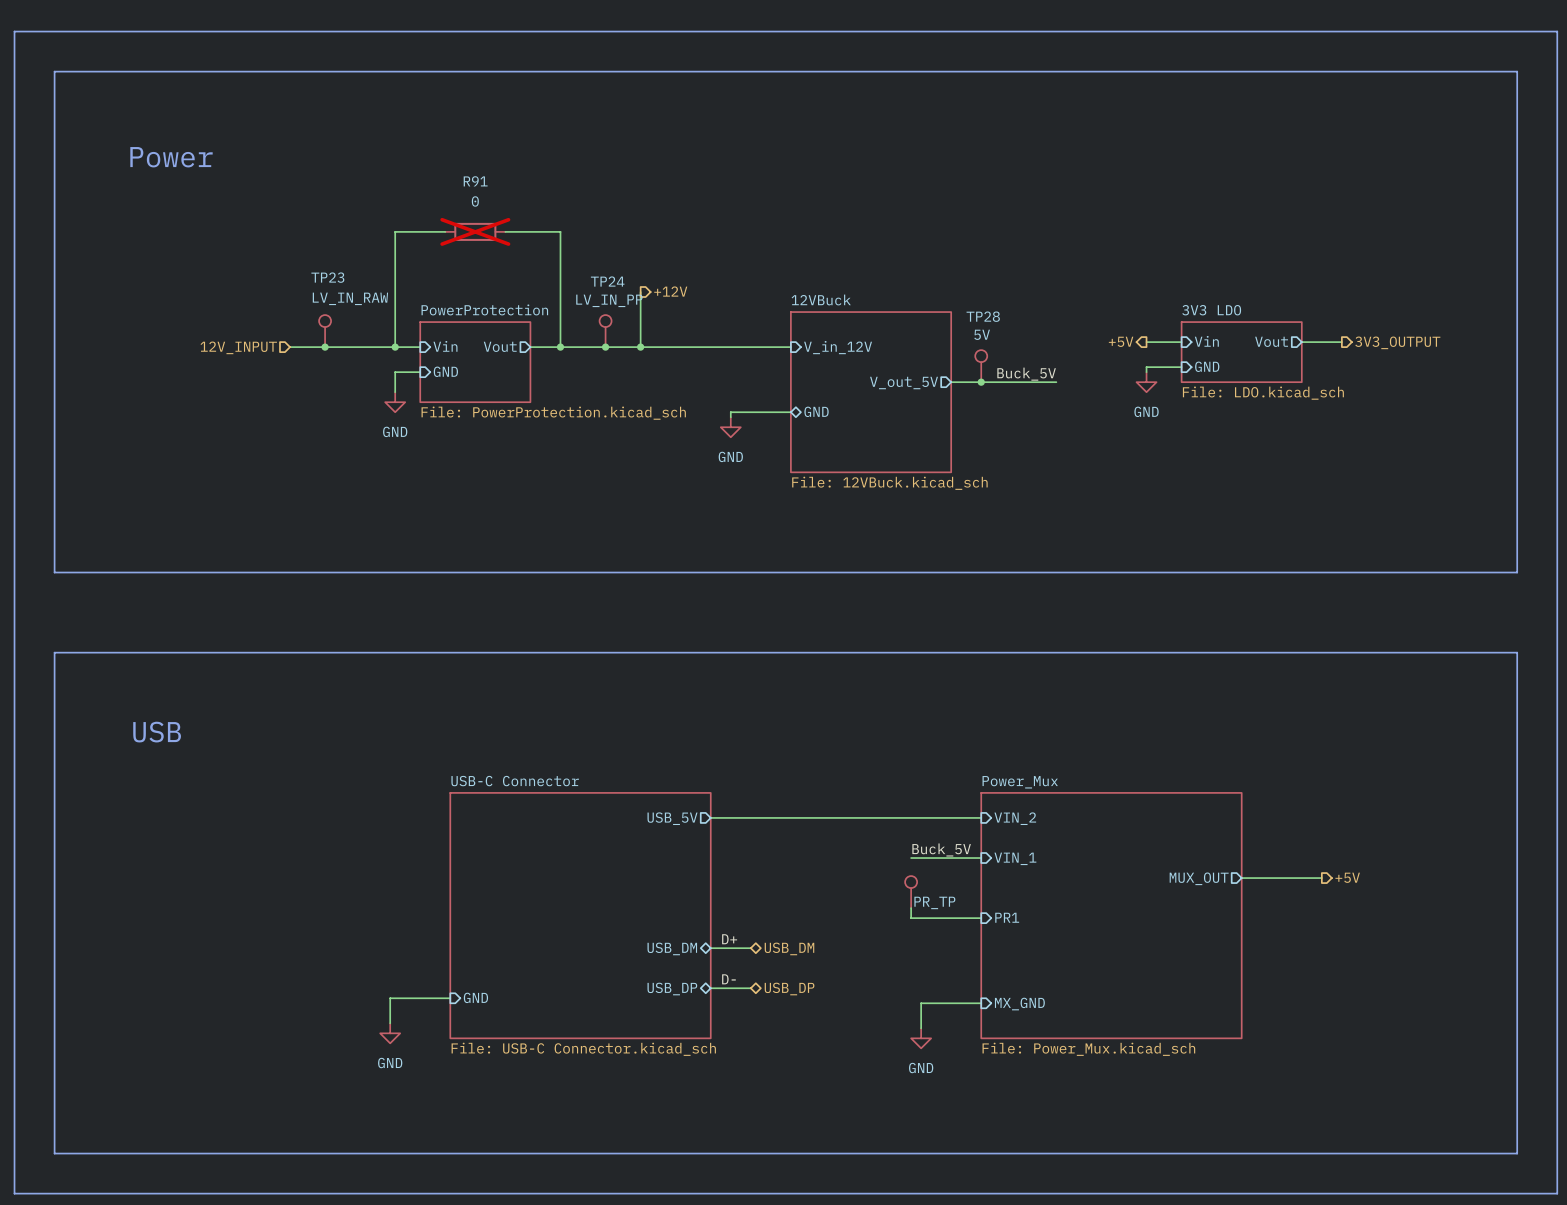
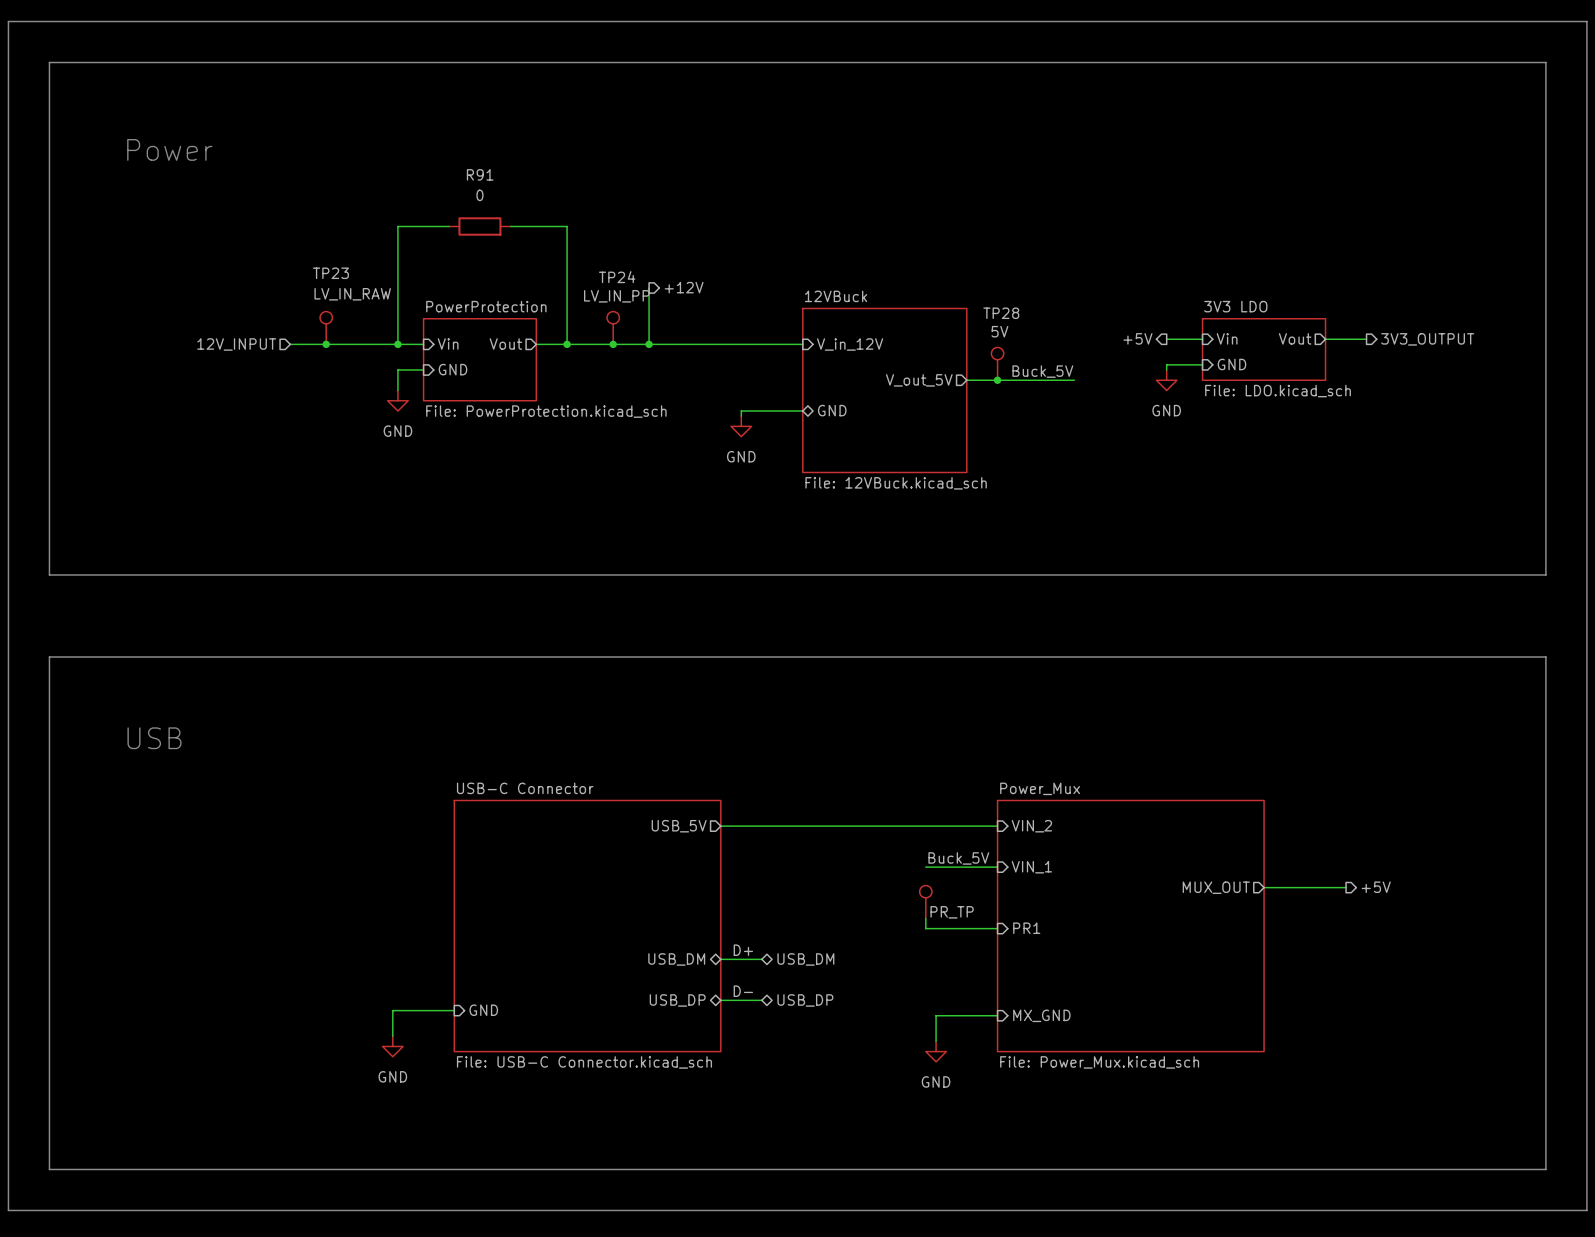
R91 do-not-place cross: (475, 231) -> none

